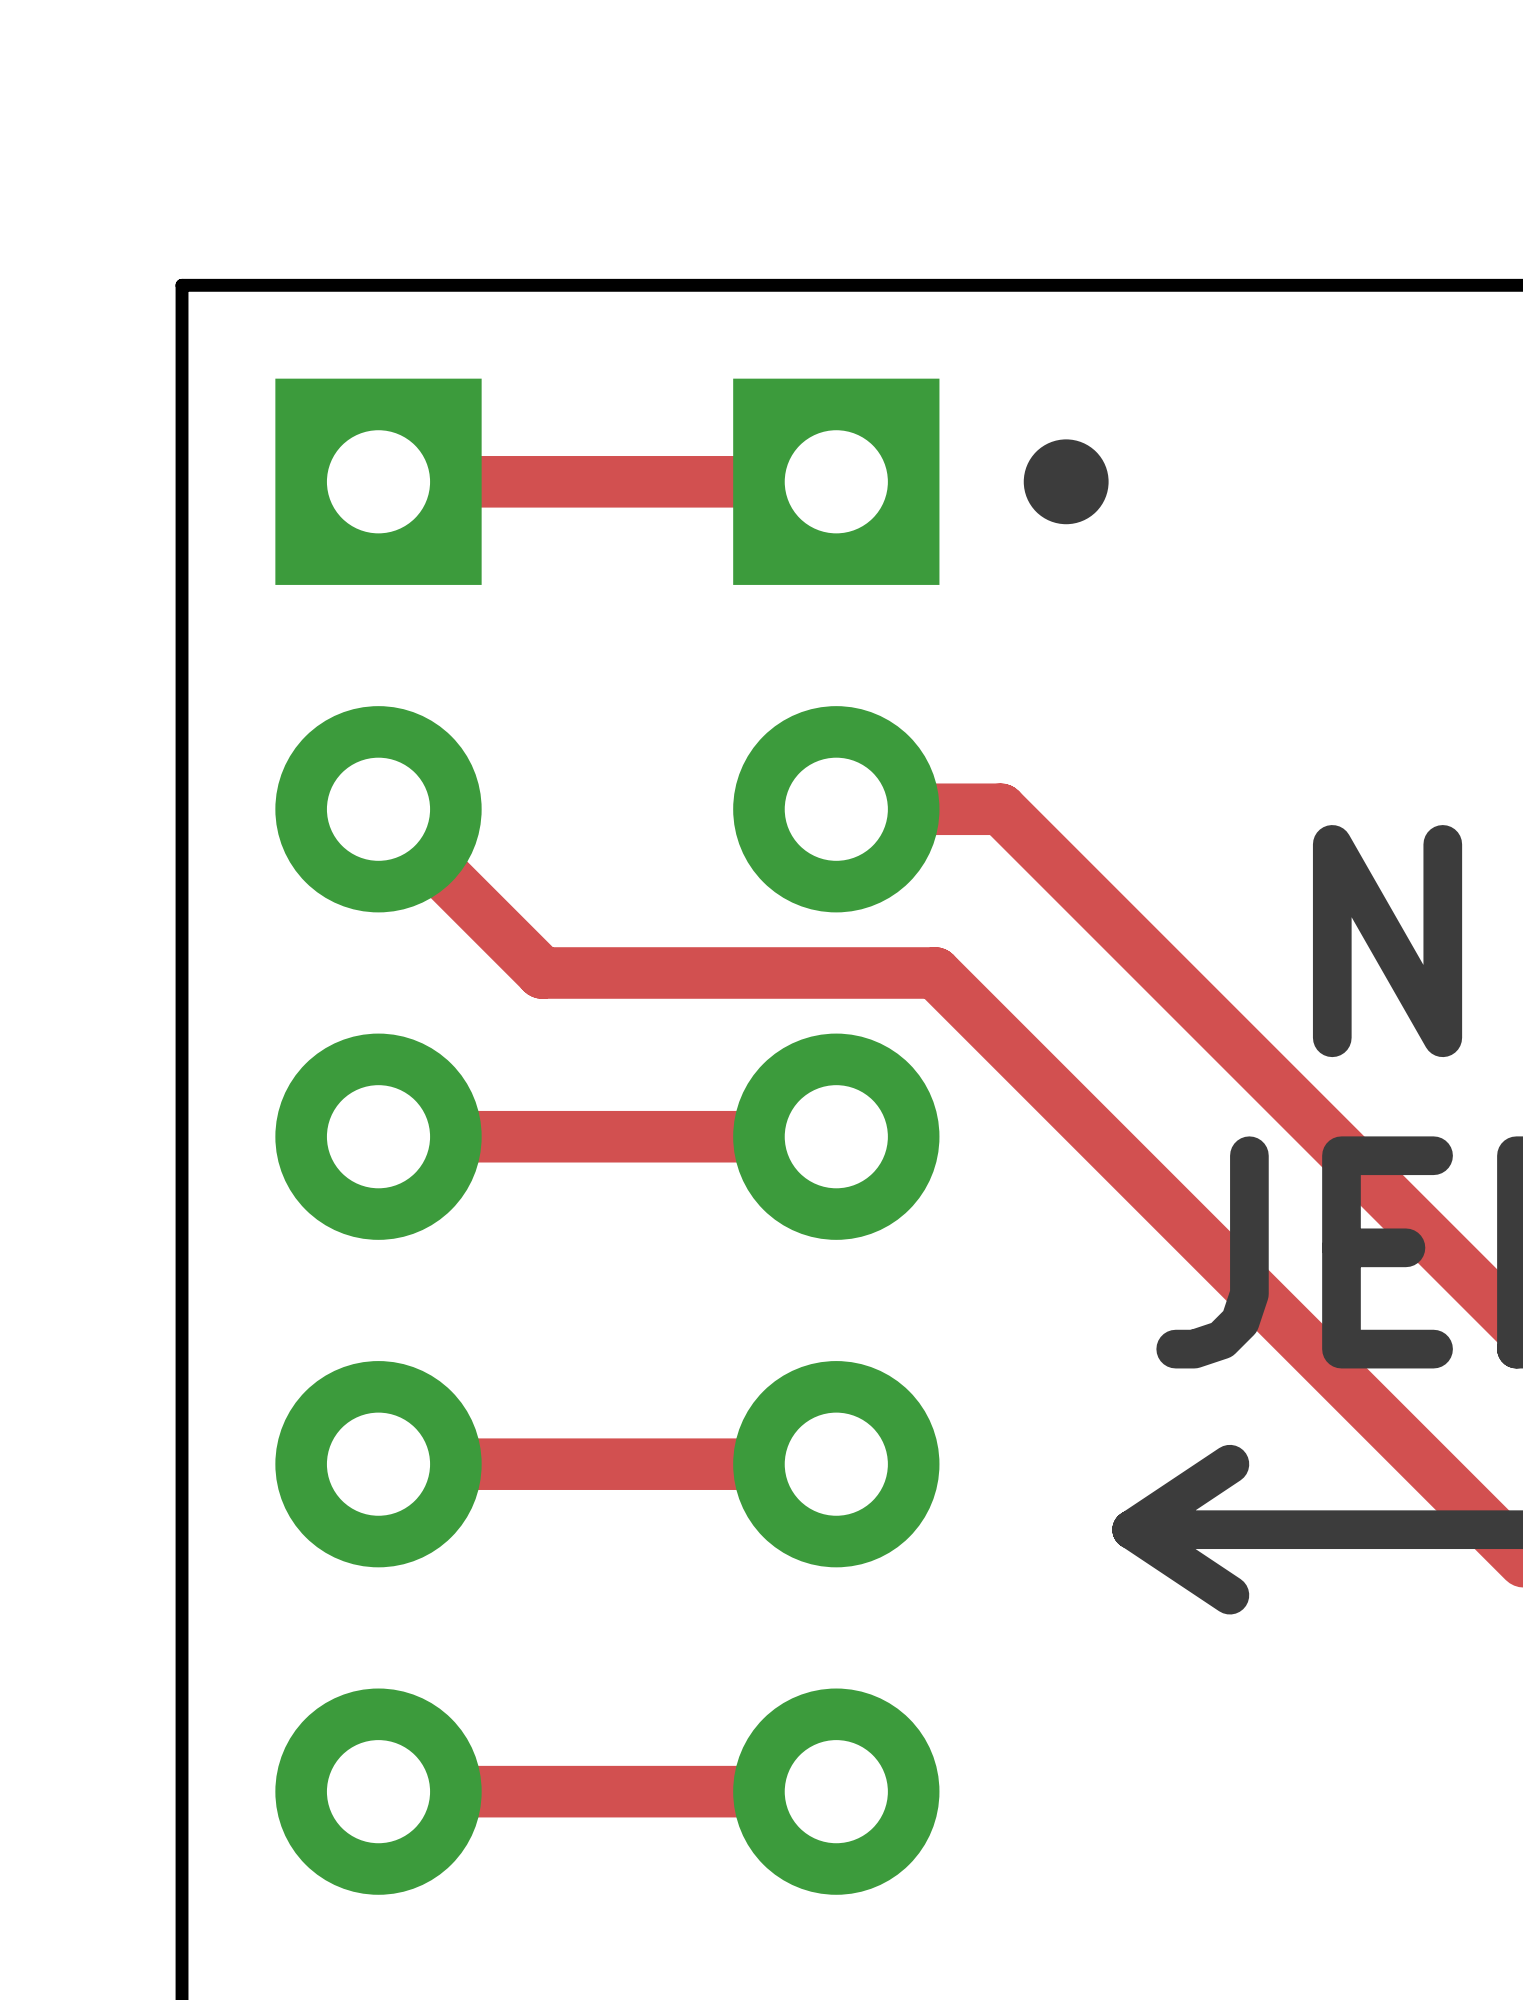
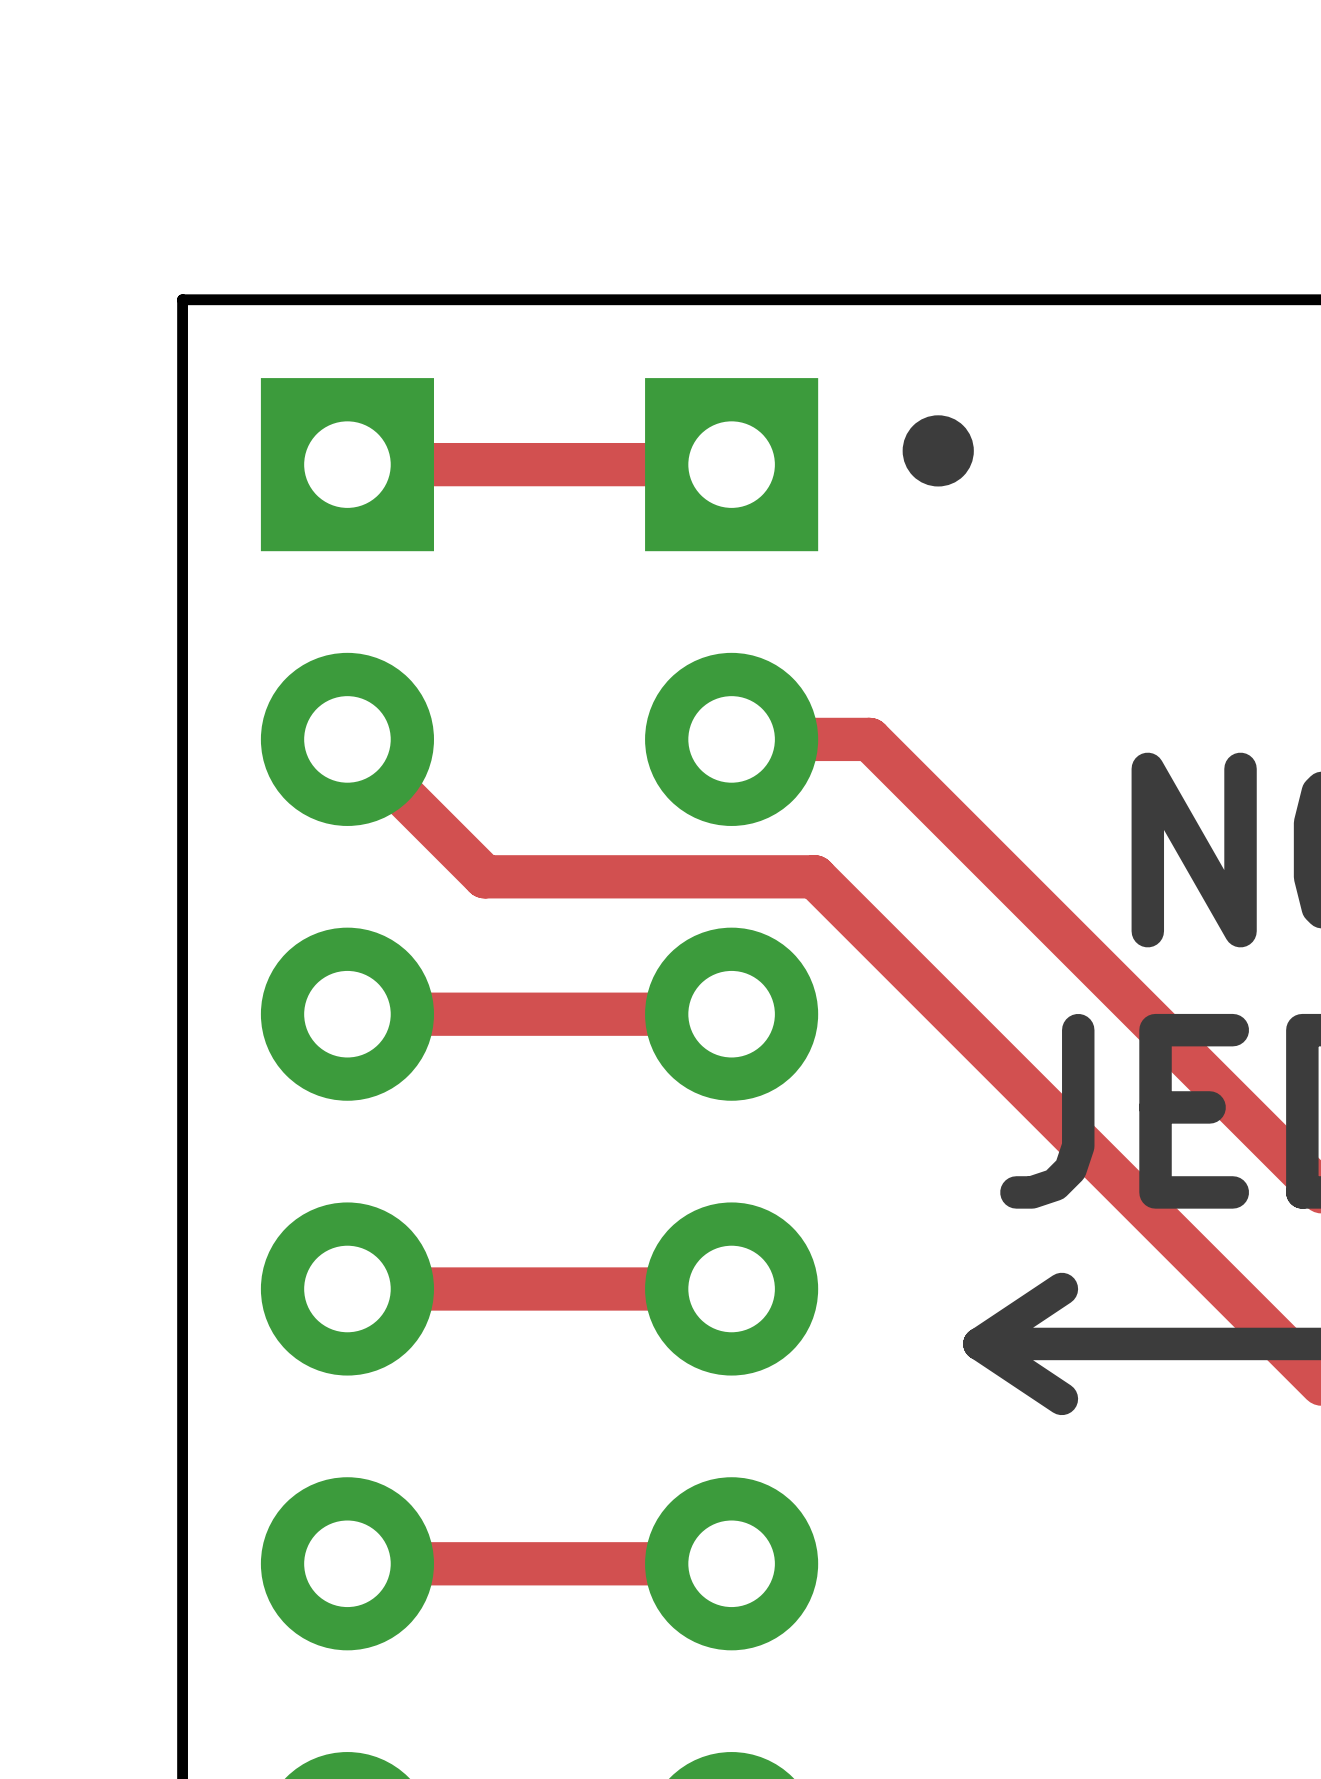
drawing position: (1066, 481) -> (938, 450)

